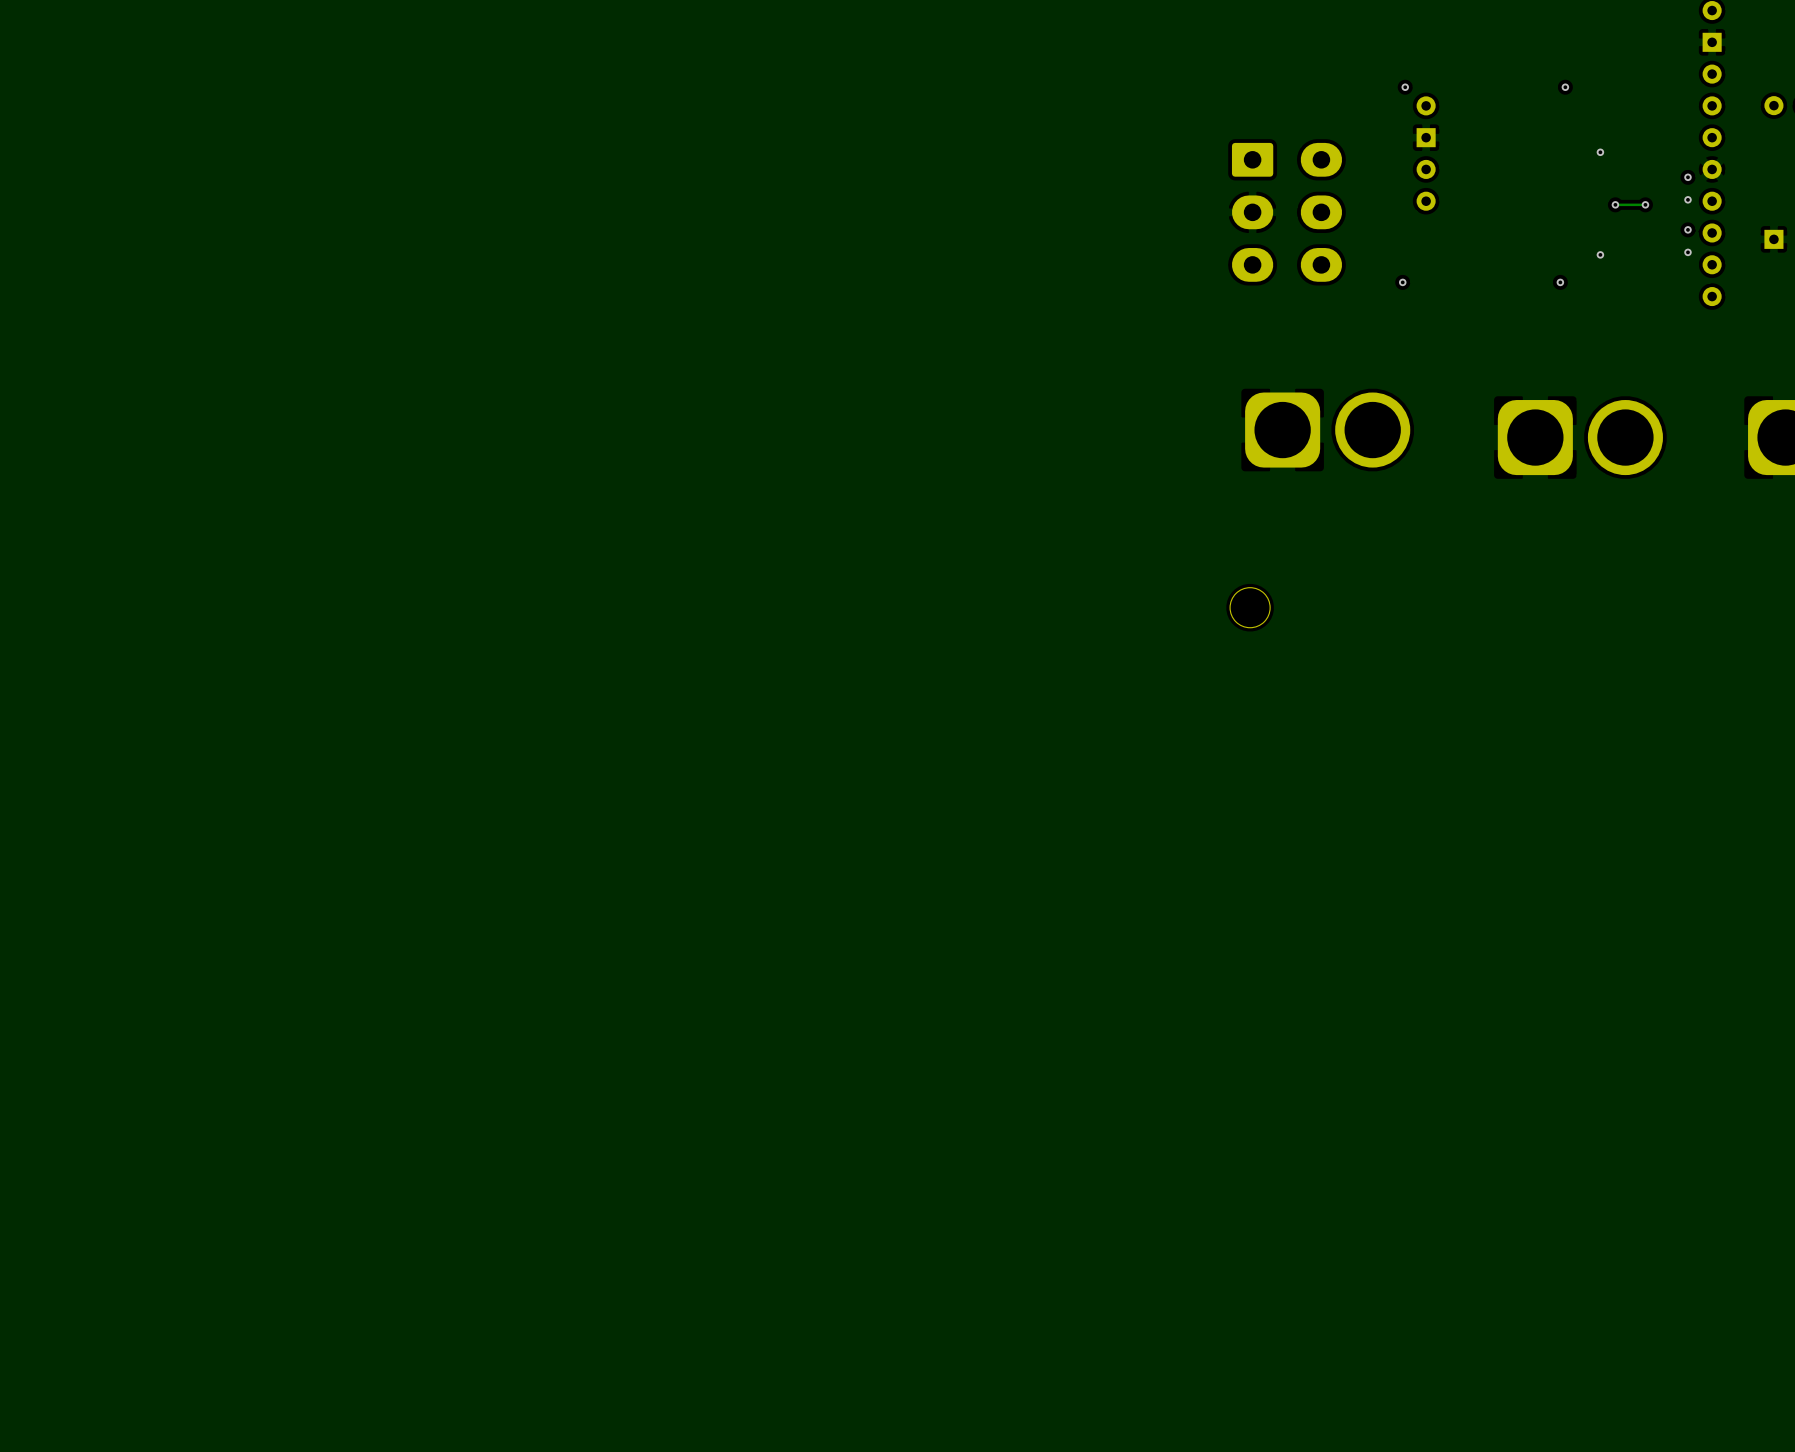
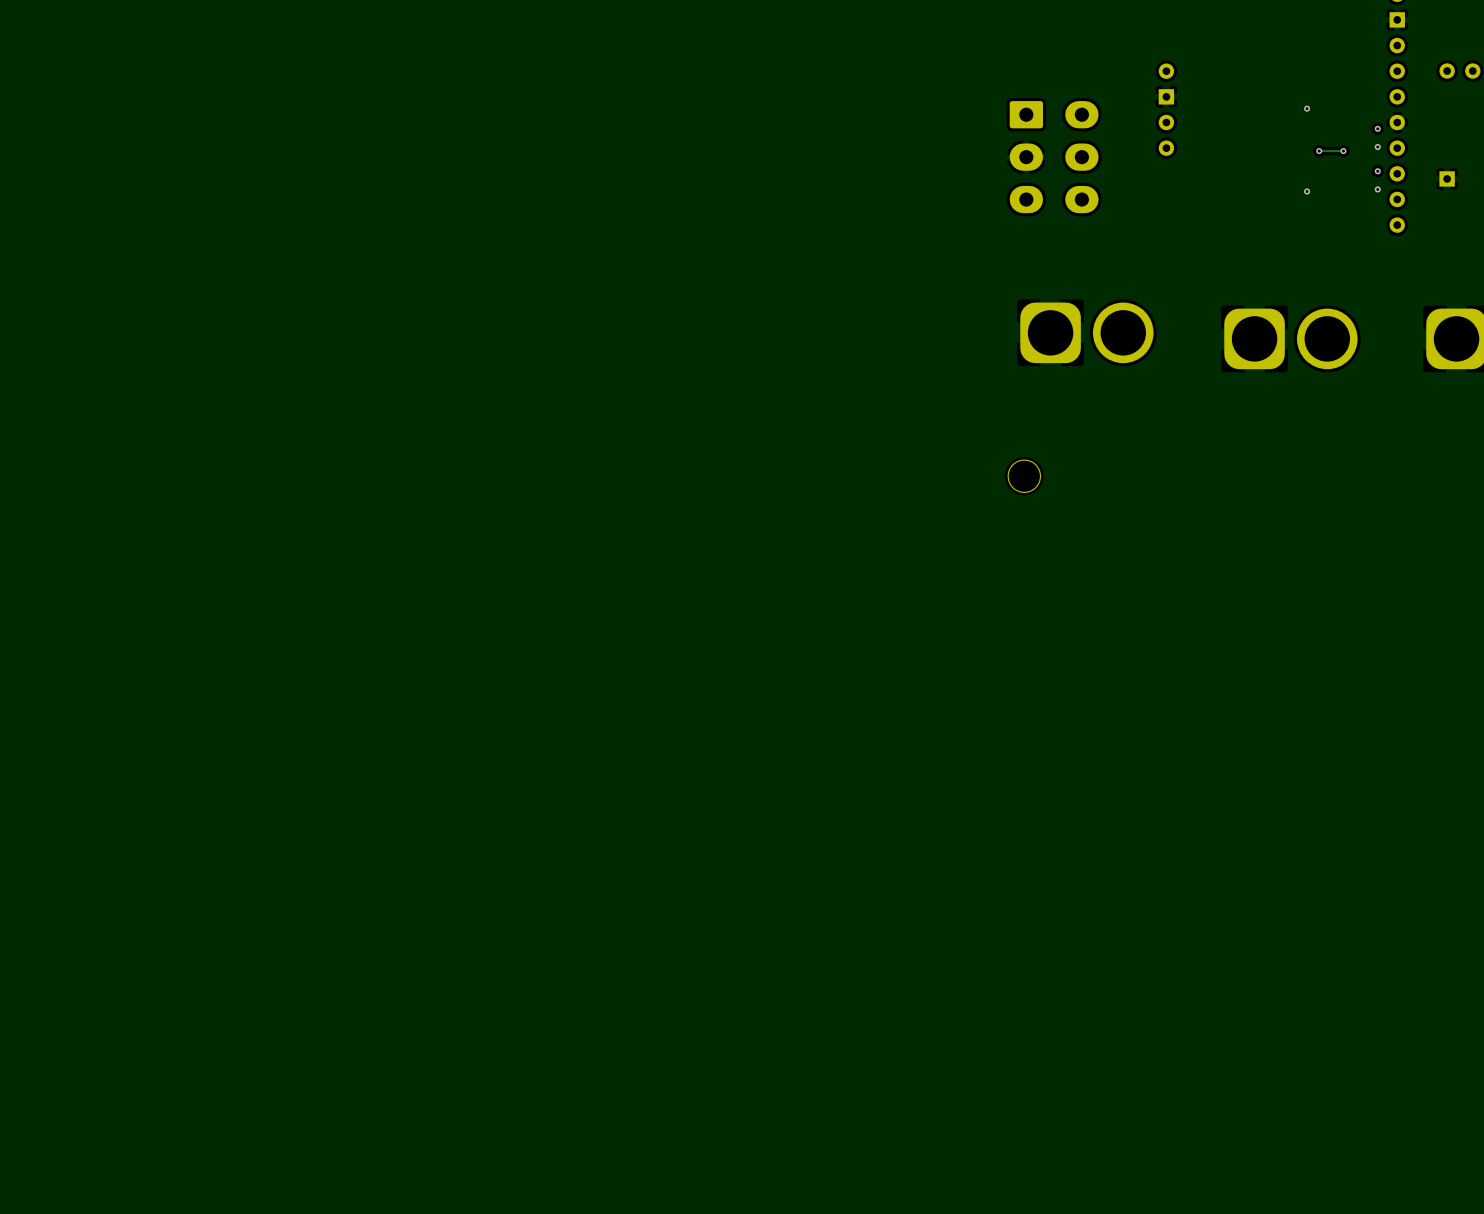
via: (1405, 87) -> none
via: (1565, 87) -> none
via: (1402, 282) -> none
via: (1560, 282) -> none

